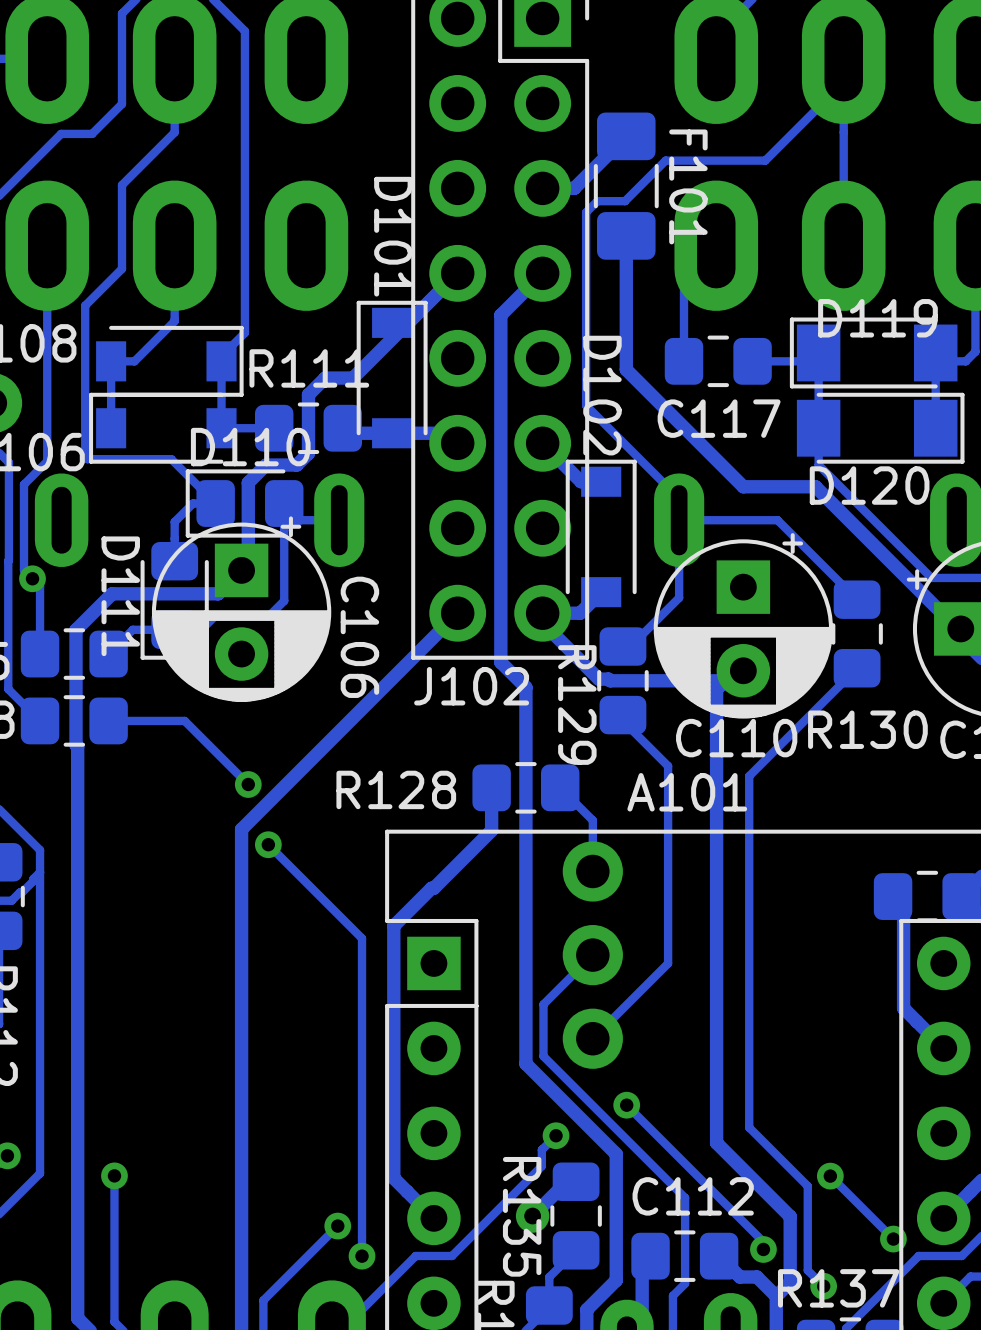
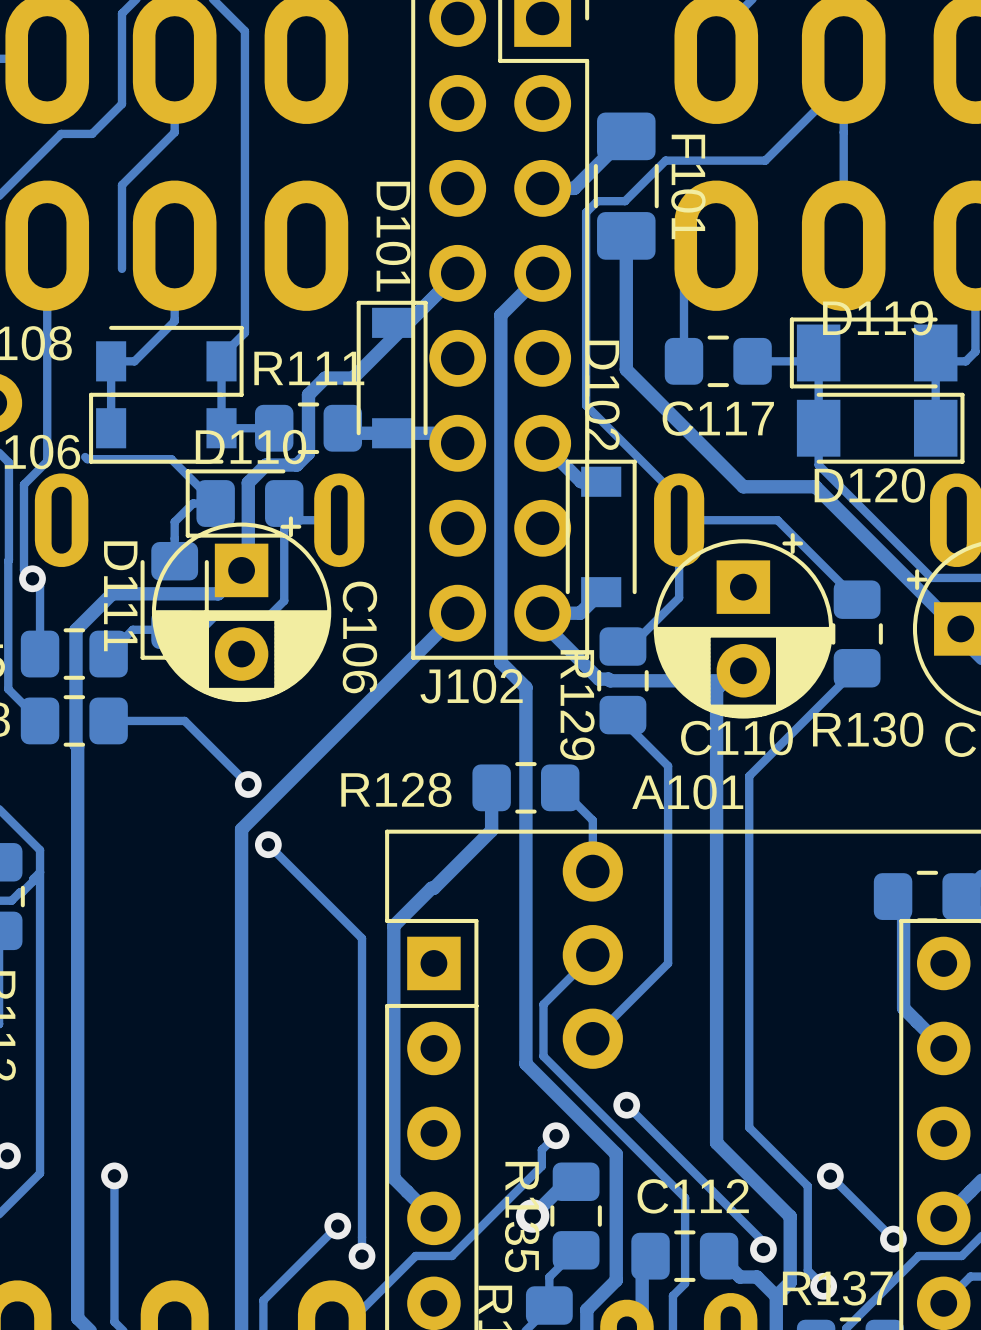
track: (122, 268) (85, 305) (85, 457) -> none

